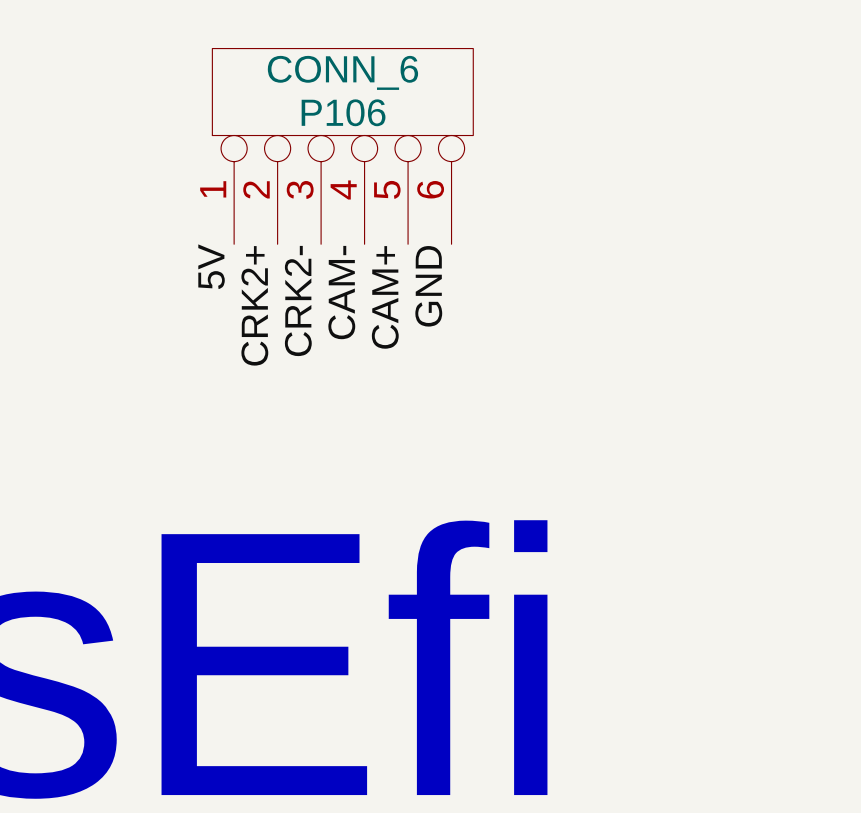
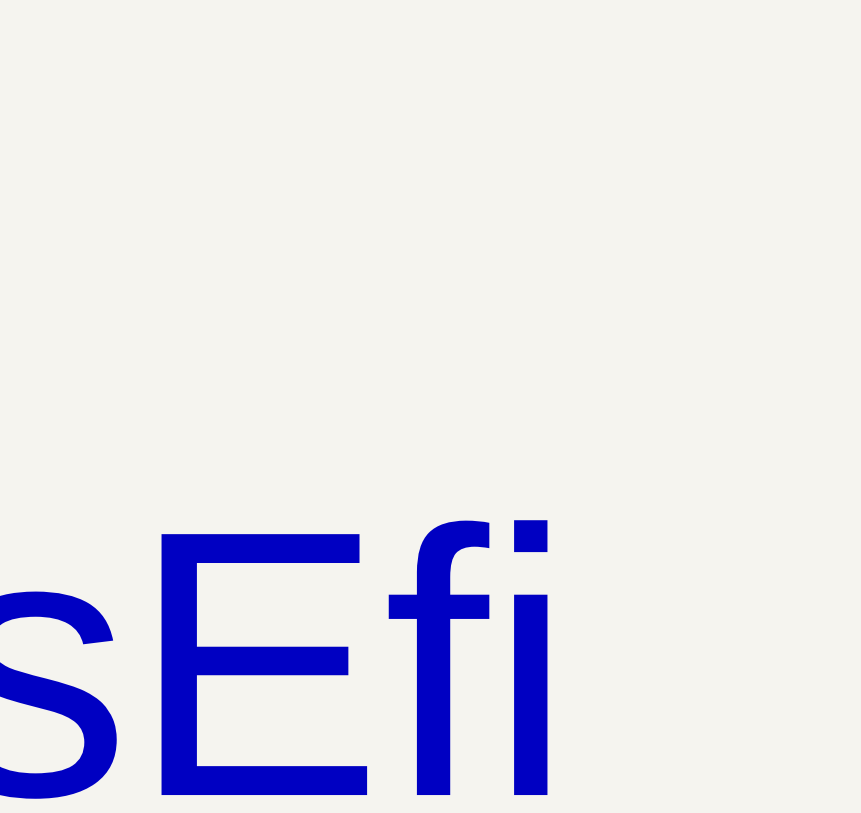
P106: CONN_6 (342, 146) -> none
label: 5V (211, 266) -> none
label: GND (428, 286) -> none
label: CAM- (341, 292) -> none
label: CAM+ (385, 297) -> none
label: CRK2- (298, 301) -> none
label: CRK2+ (254, 305) -> none

